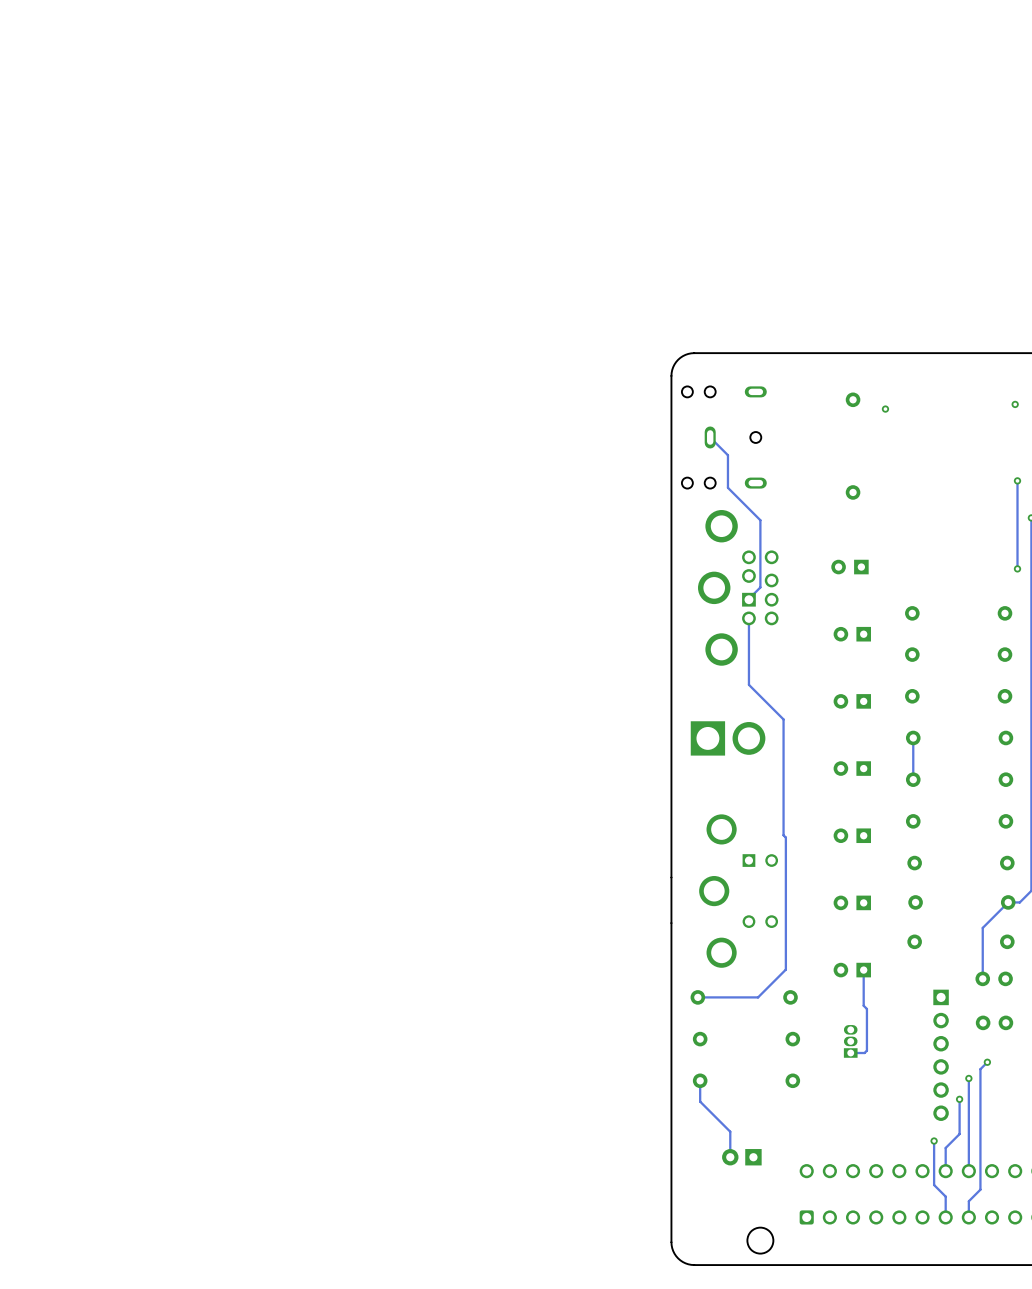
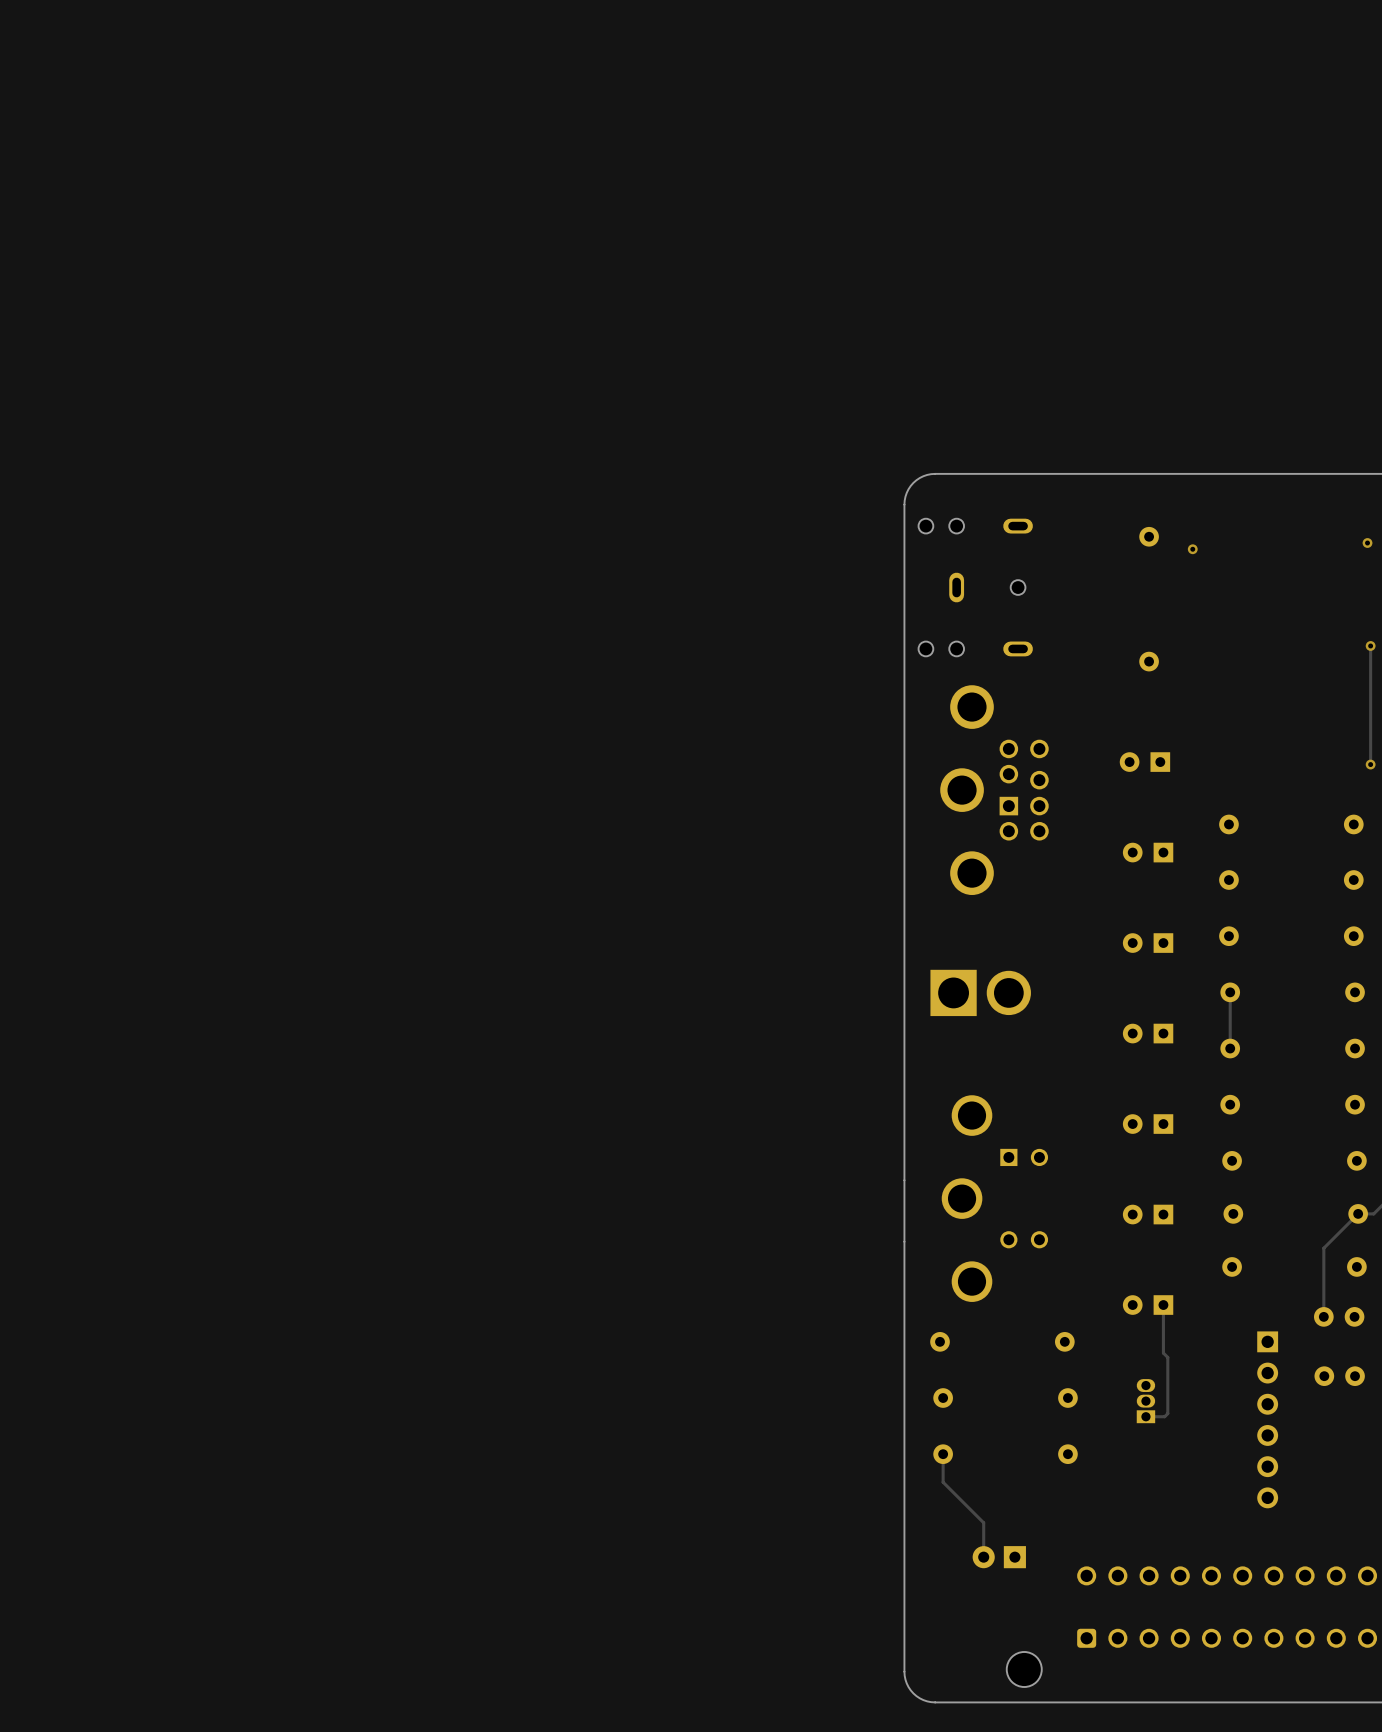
track: (710, 437) (727, 455) (727, 487) (760, 520) (760, 587) (748, 599) -> none
track: (748, 618) (748, 684) (783, 719) (785, 969) (758, 997) (697, 997) -> none
track: (987, 1062) (980, 1069) (980, 1189) (968, 1201) (968, 1217) -> none
via: (987, 1062) -> none
track: (968, 1078) (968, 1171) -> none
via: (968, 1078) -> none
track: (959, 1099) (959, 1134) (945, 1147) (945, 1171) -> none
via: (959, 1099) -> none
track: (934, 1141) (934, 1185) (945, 1196) (945, 1217) -> none
via: (934, 1141) -> none

